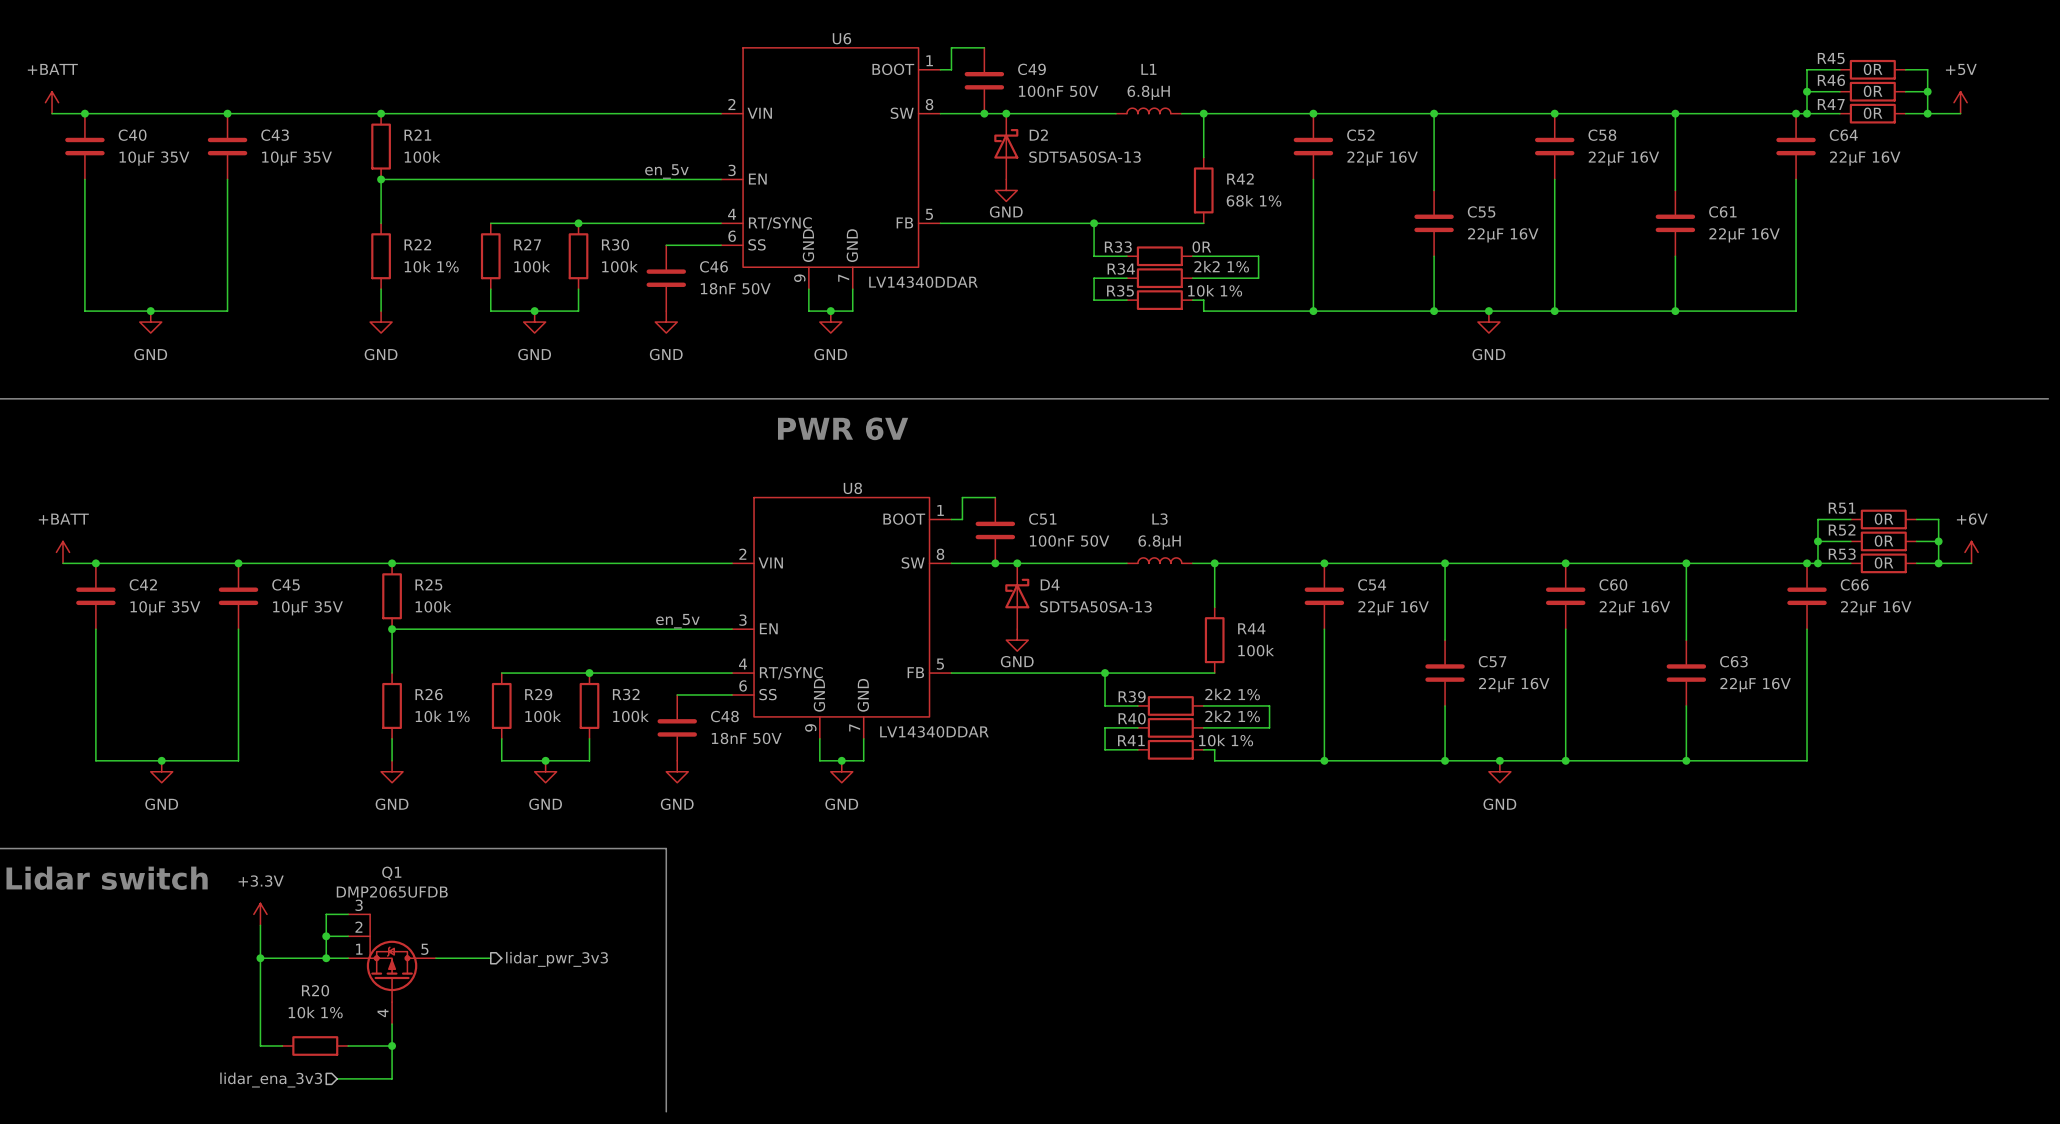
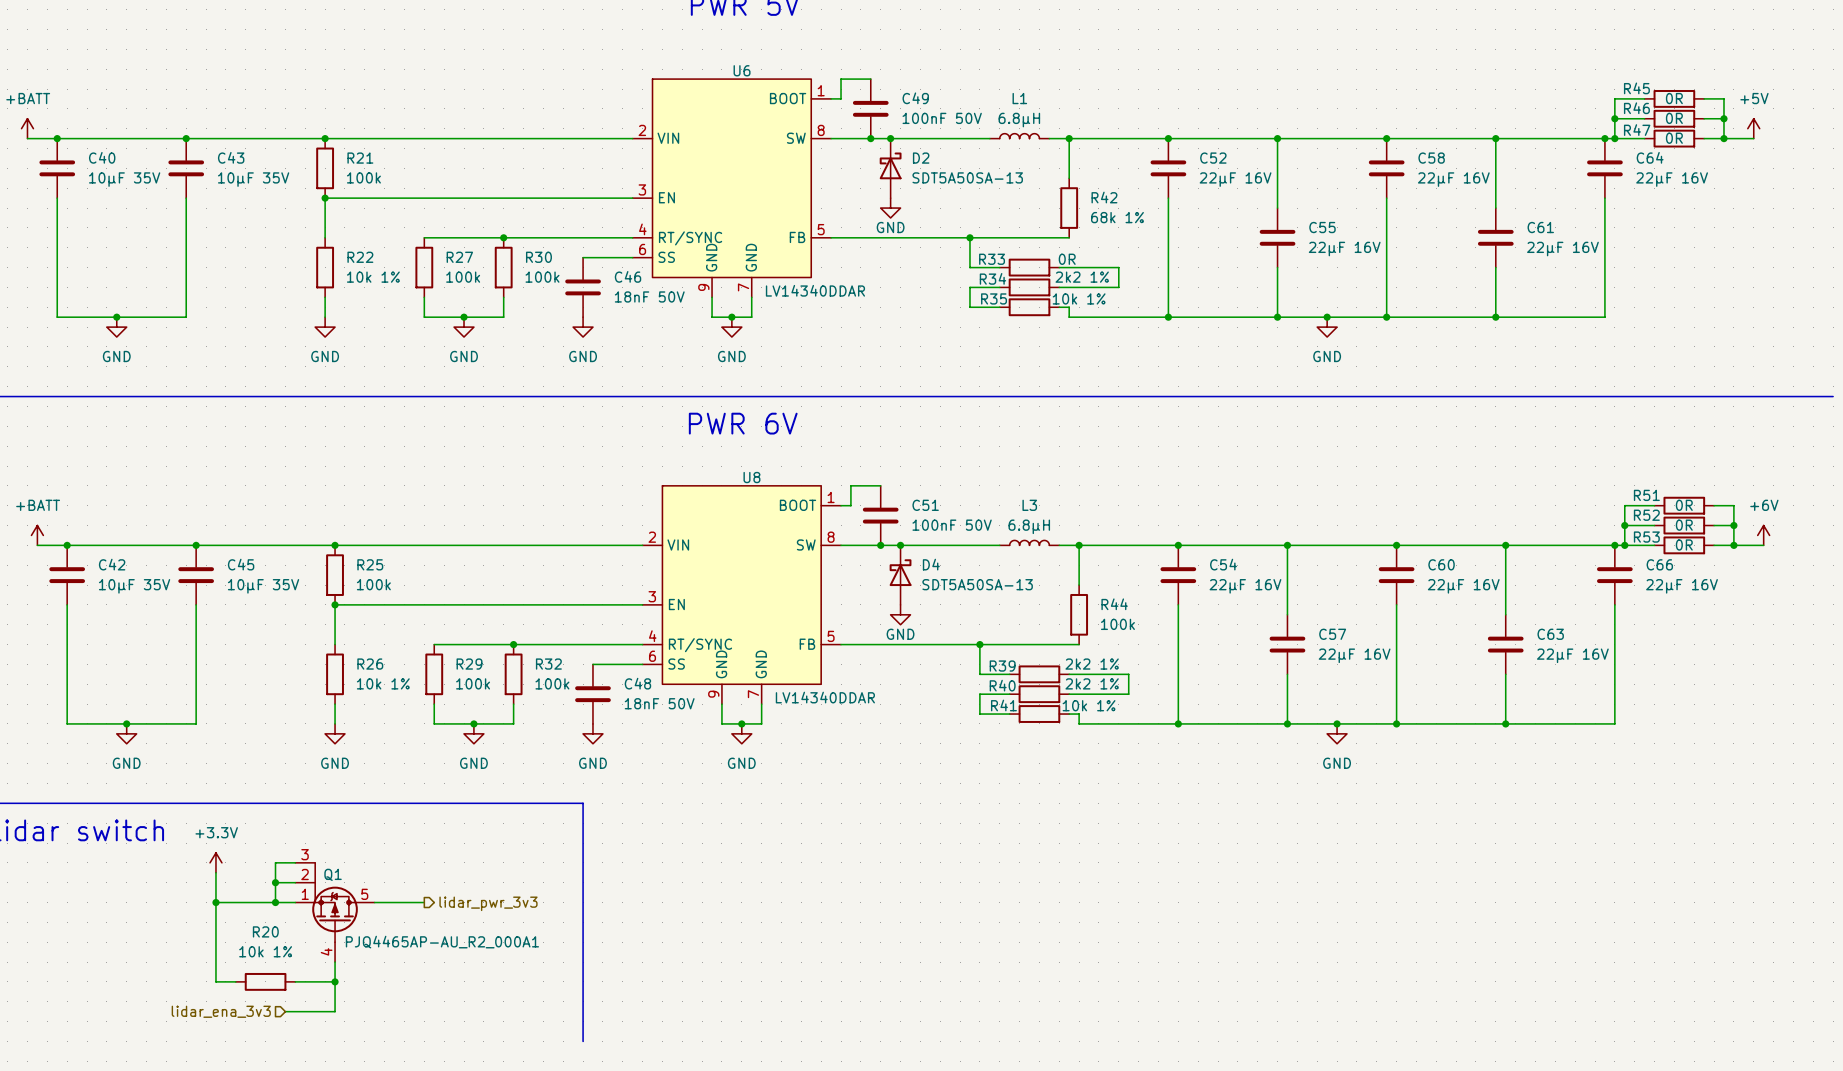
label: en_5v (666, 171) -> none
label: en_5v (677, 621) -> none
Q1 name position: Q1 (391, 873) -> Q1 (333, 874)
Q1 value: DMP2065UFDB (392, 892) -> PJQ4465AP-AU_R2_000A1 (442, 942)

